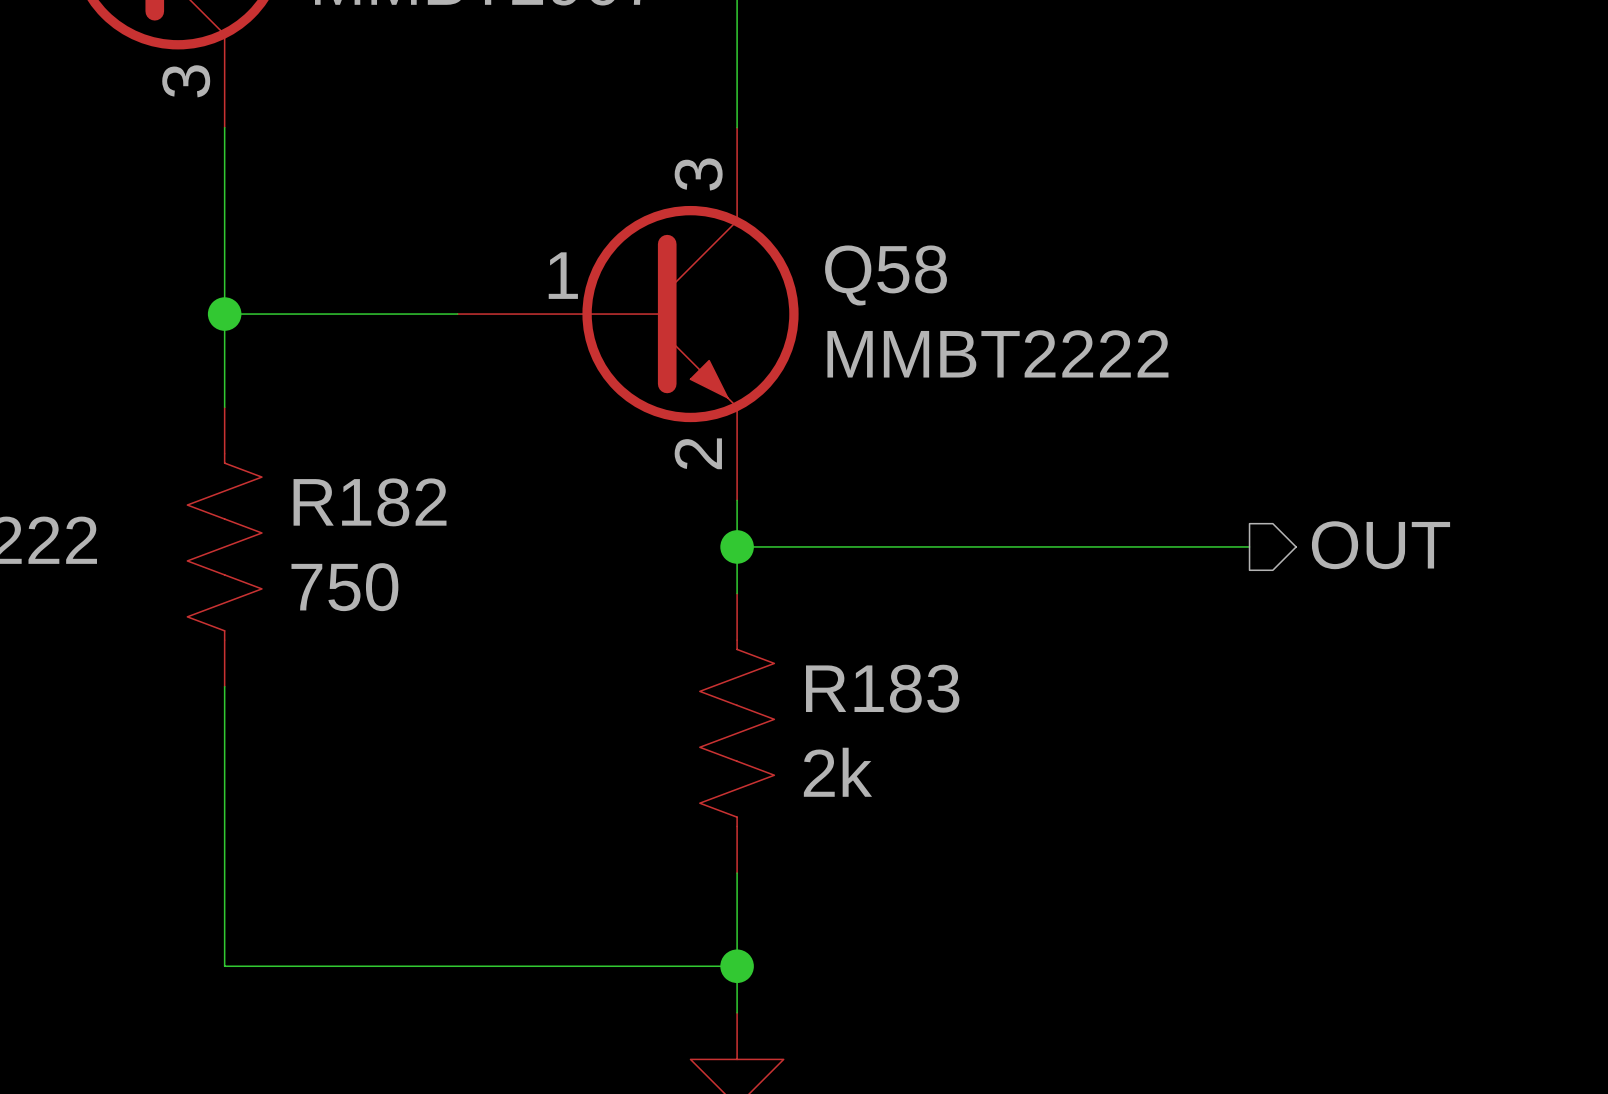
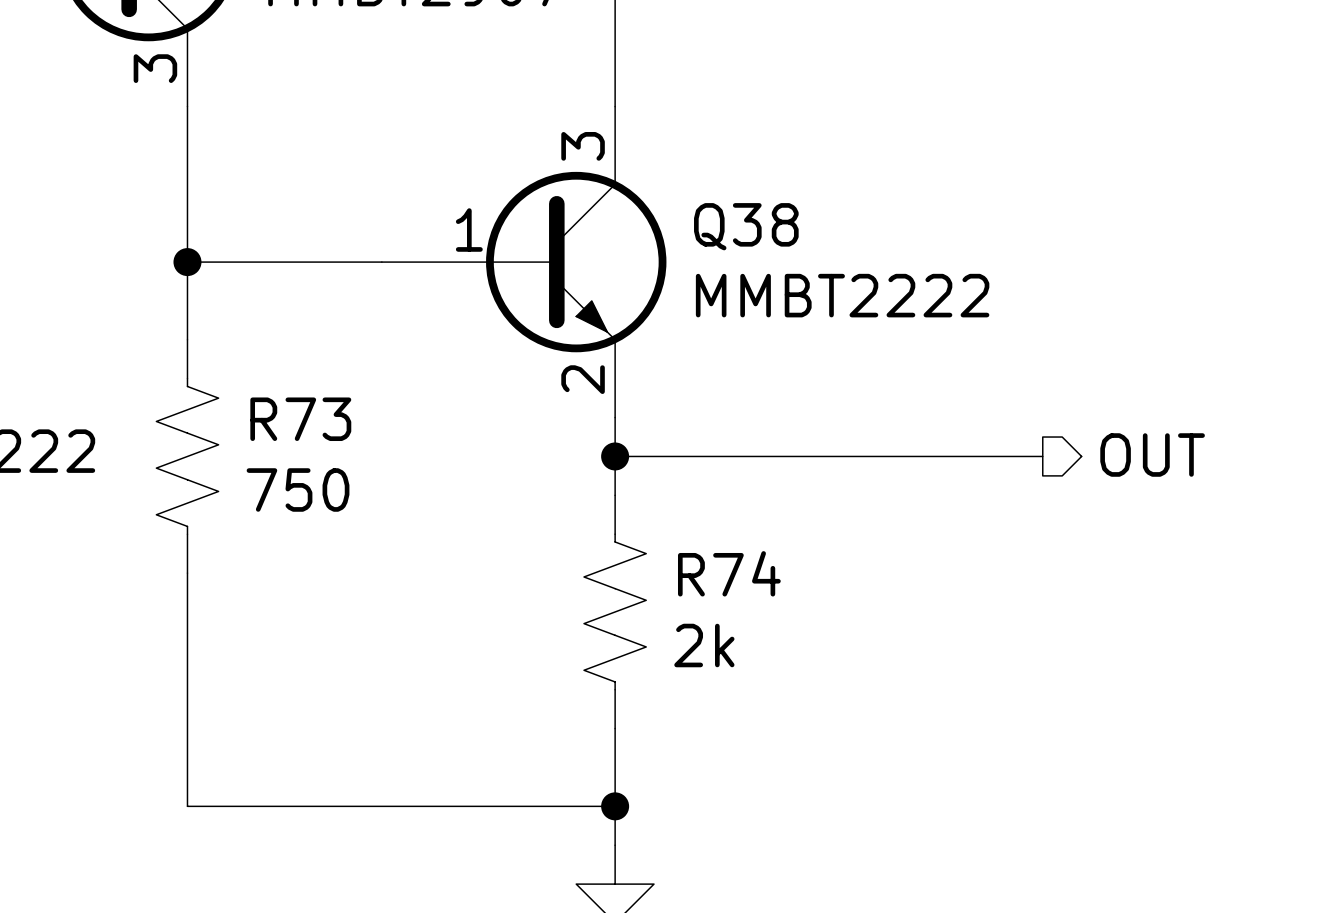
Q58 name: Q58 (886, 275) -> Q38 (746, 226)
R182 name: R182 (370, 502) -> R73 (300, 419)
R183 name: R183 (882, 688) -> R74 (729, 573)

